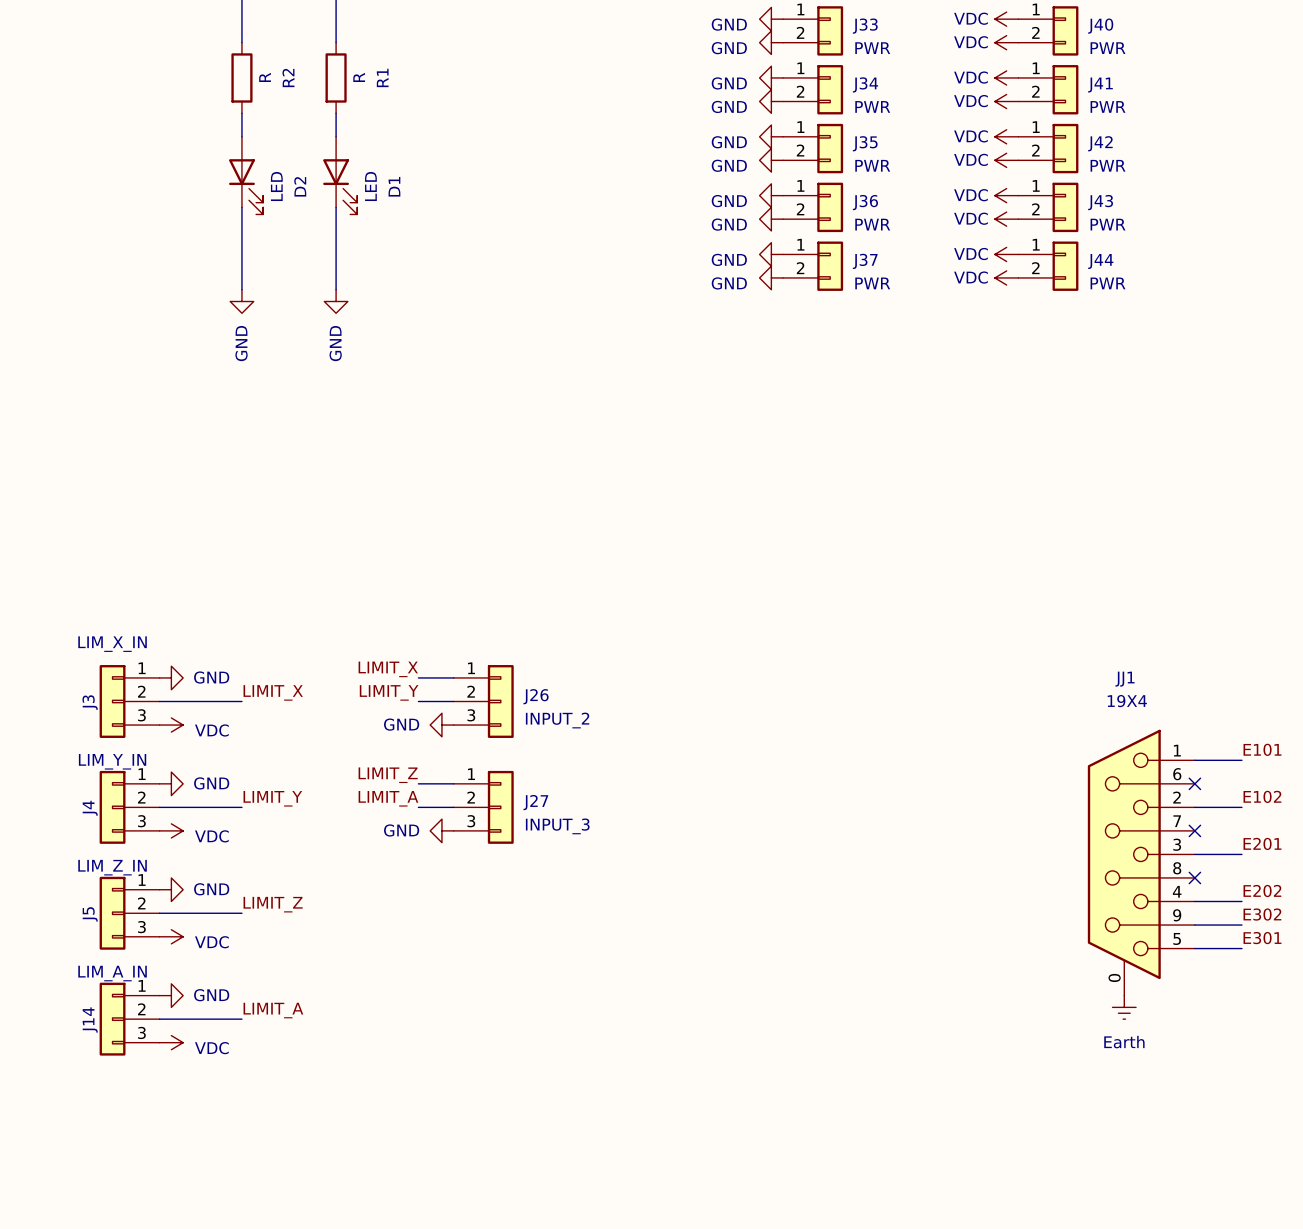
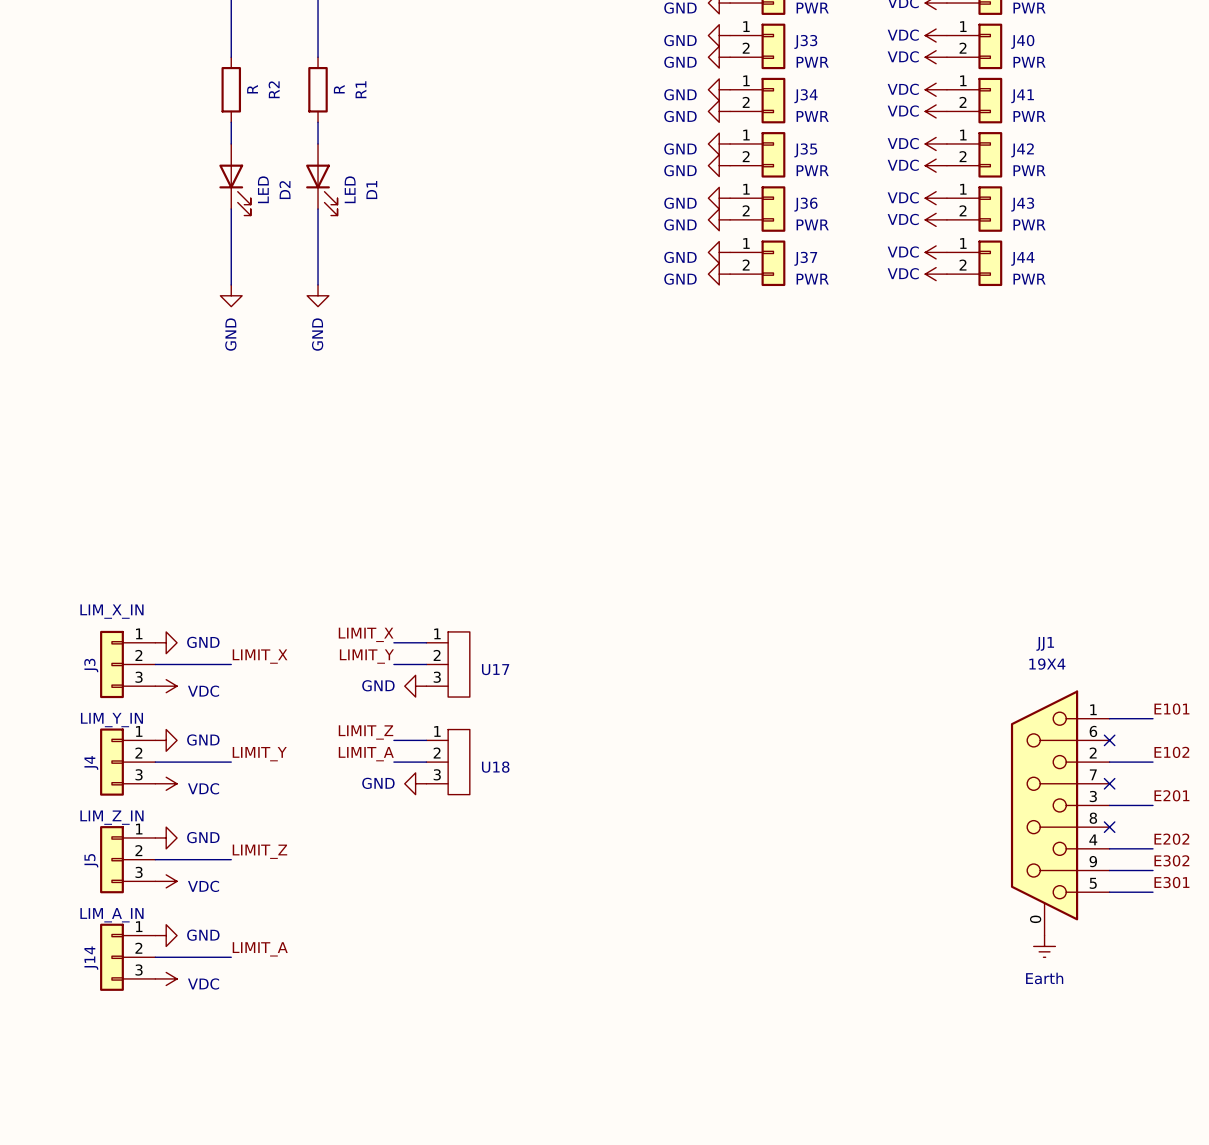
U17: none -> (448, 664)
J26: INPUT_2 (483, 701) -> none
U18: none -> (448, 762)
J27: INPUT_3 (483, 807) -> none

